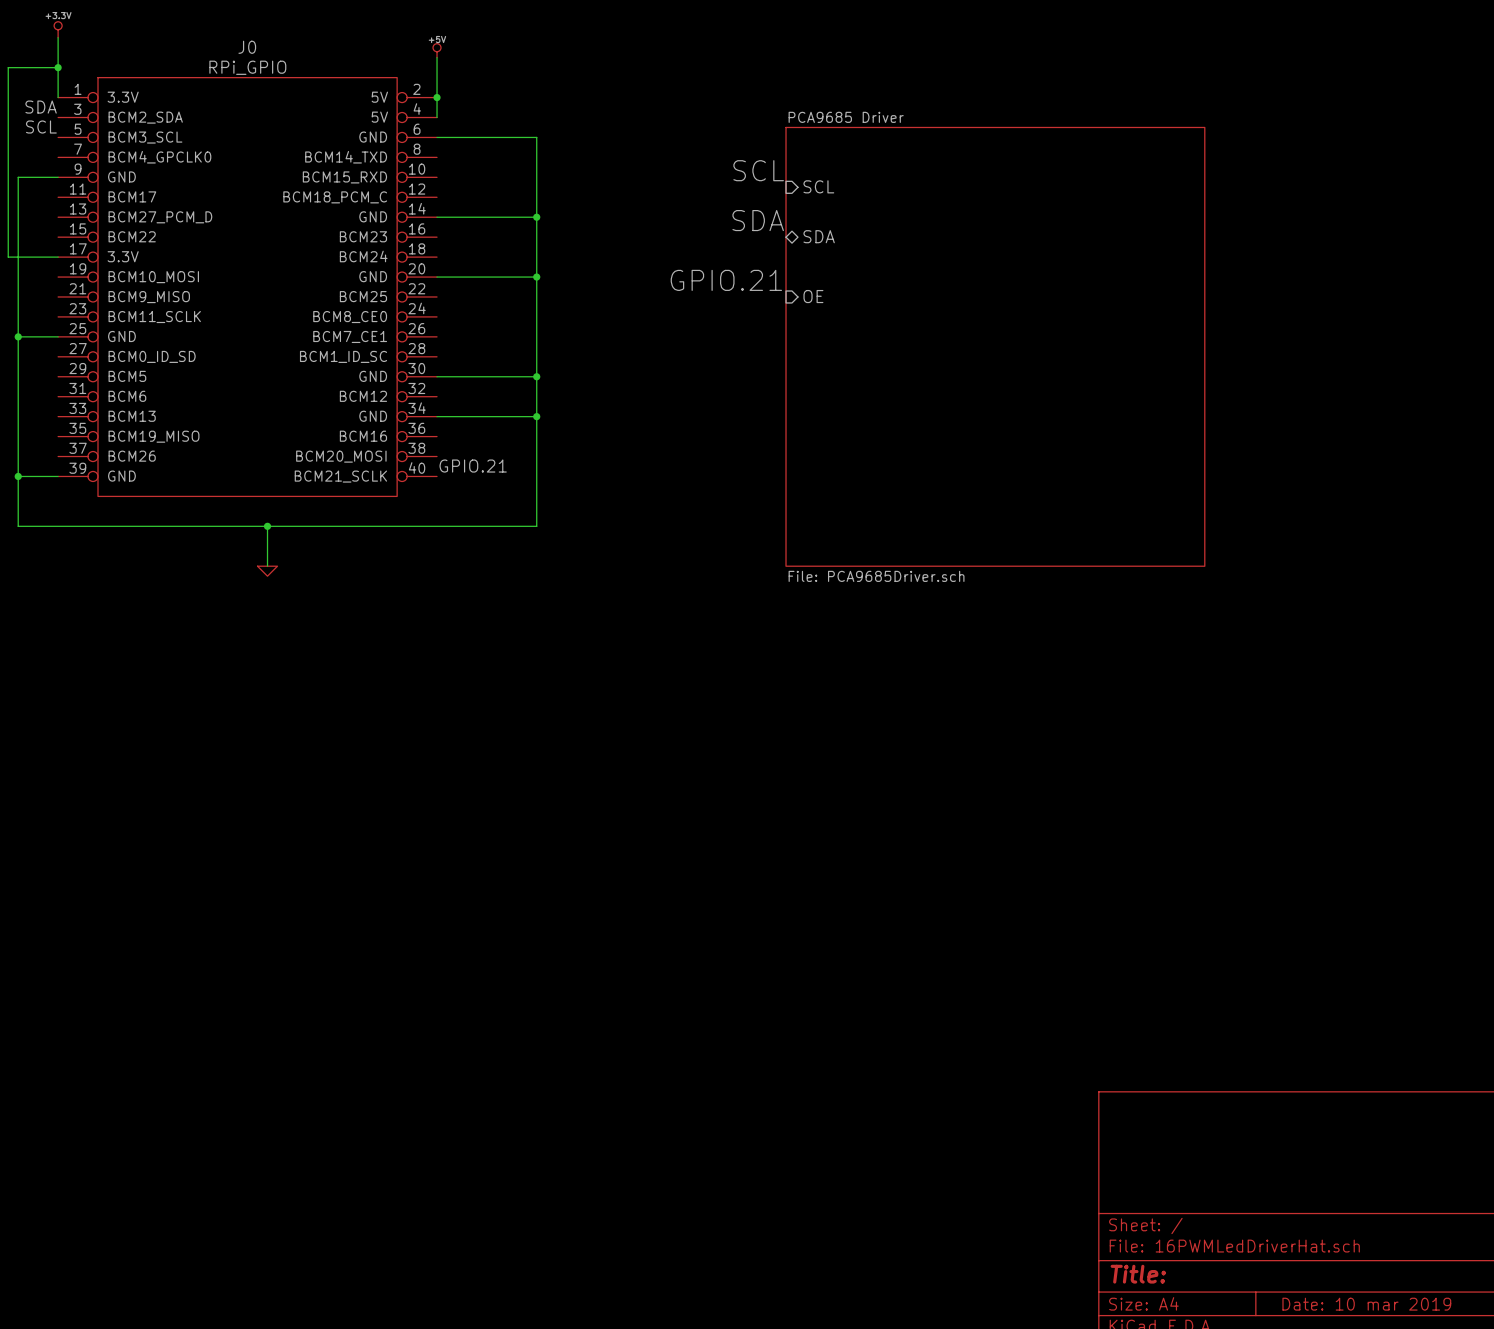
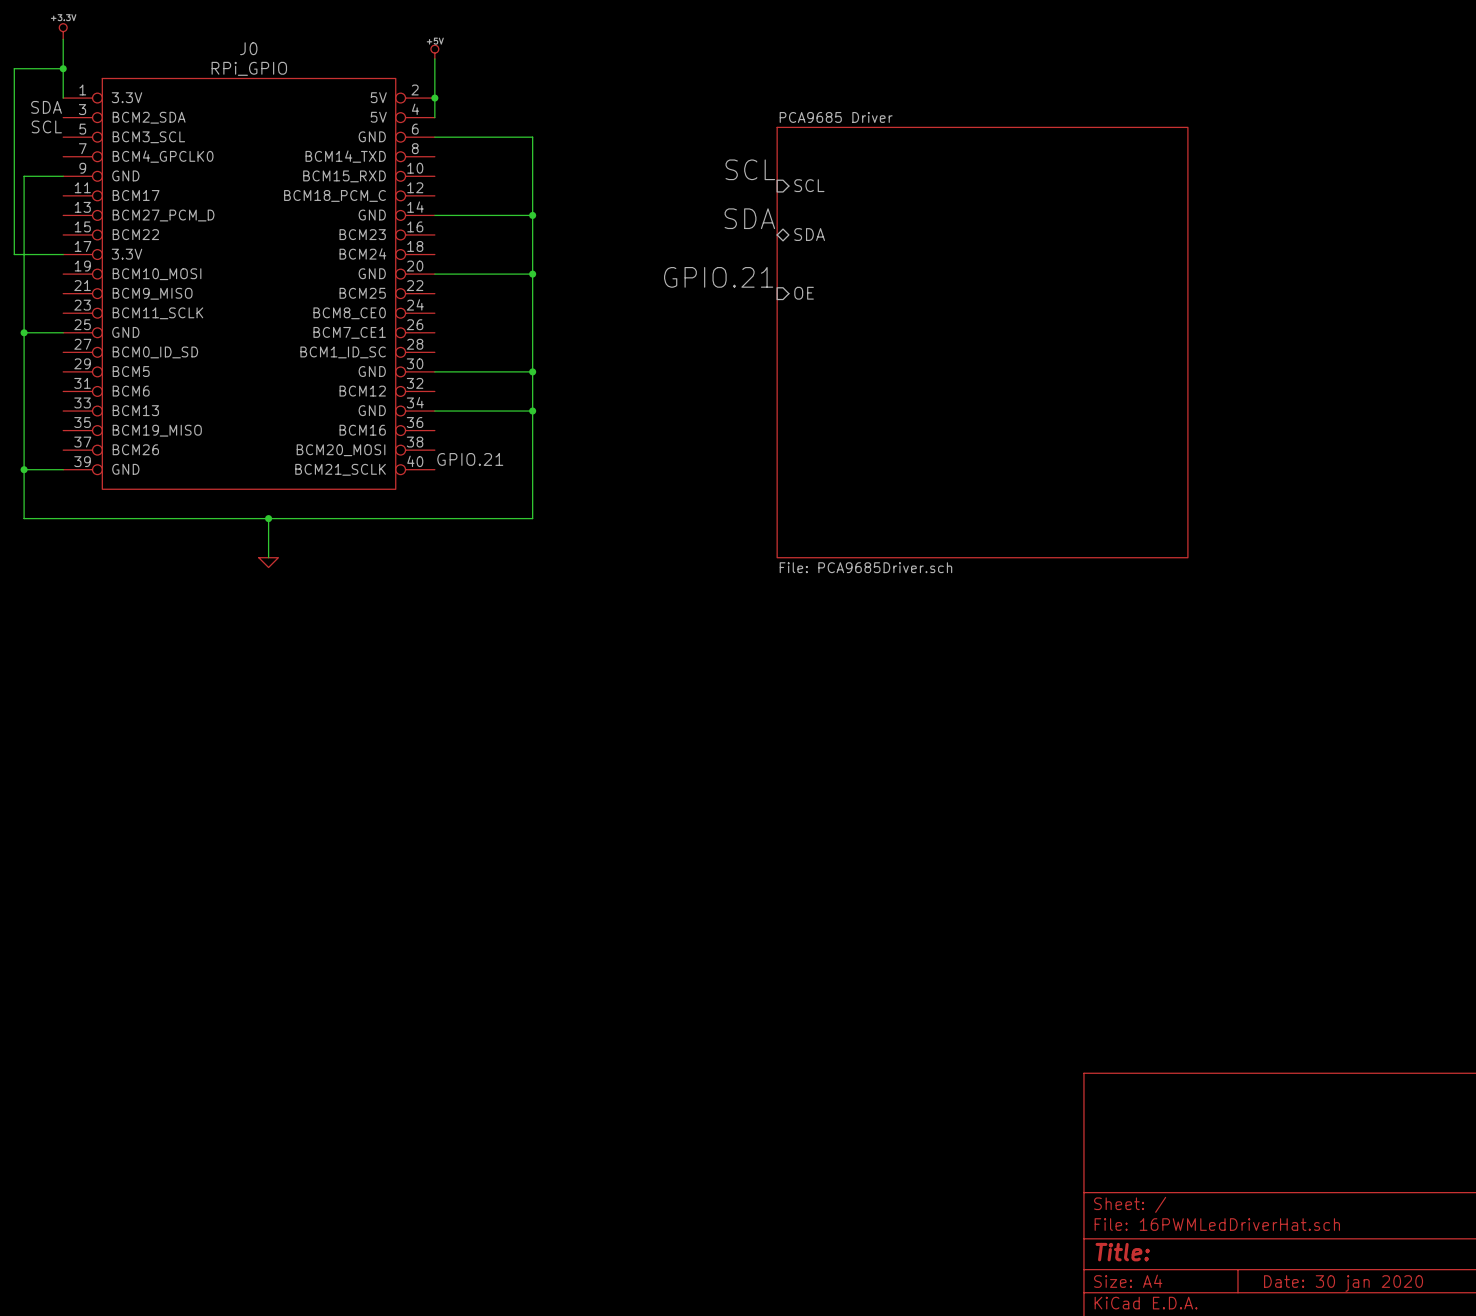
title block: Date: 10 mar 2019 (1366, 1304) -> Date: 30 jan 2020 (1343, 1283)

